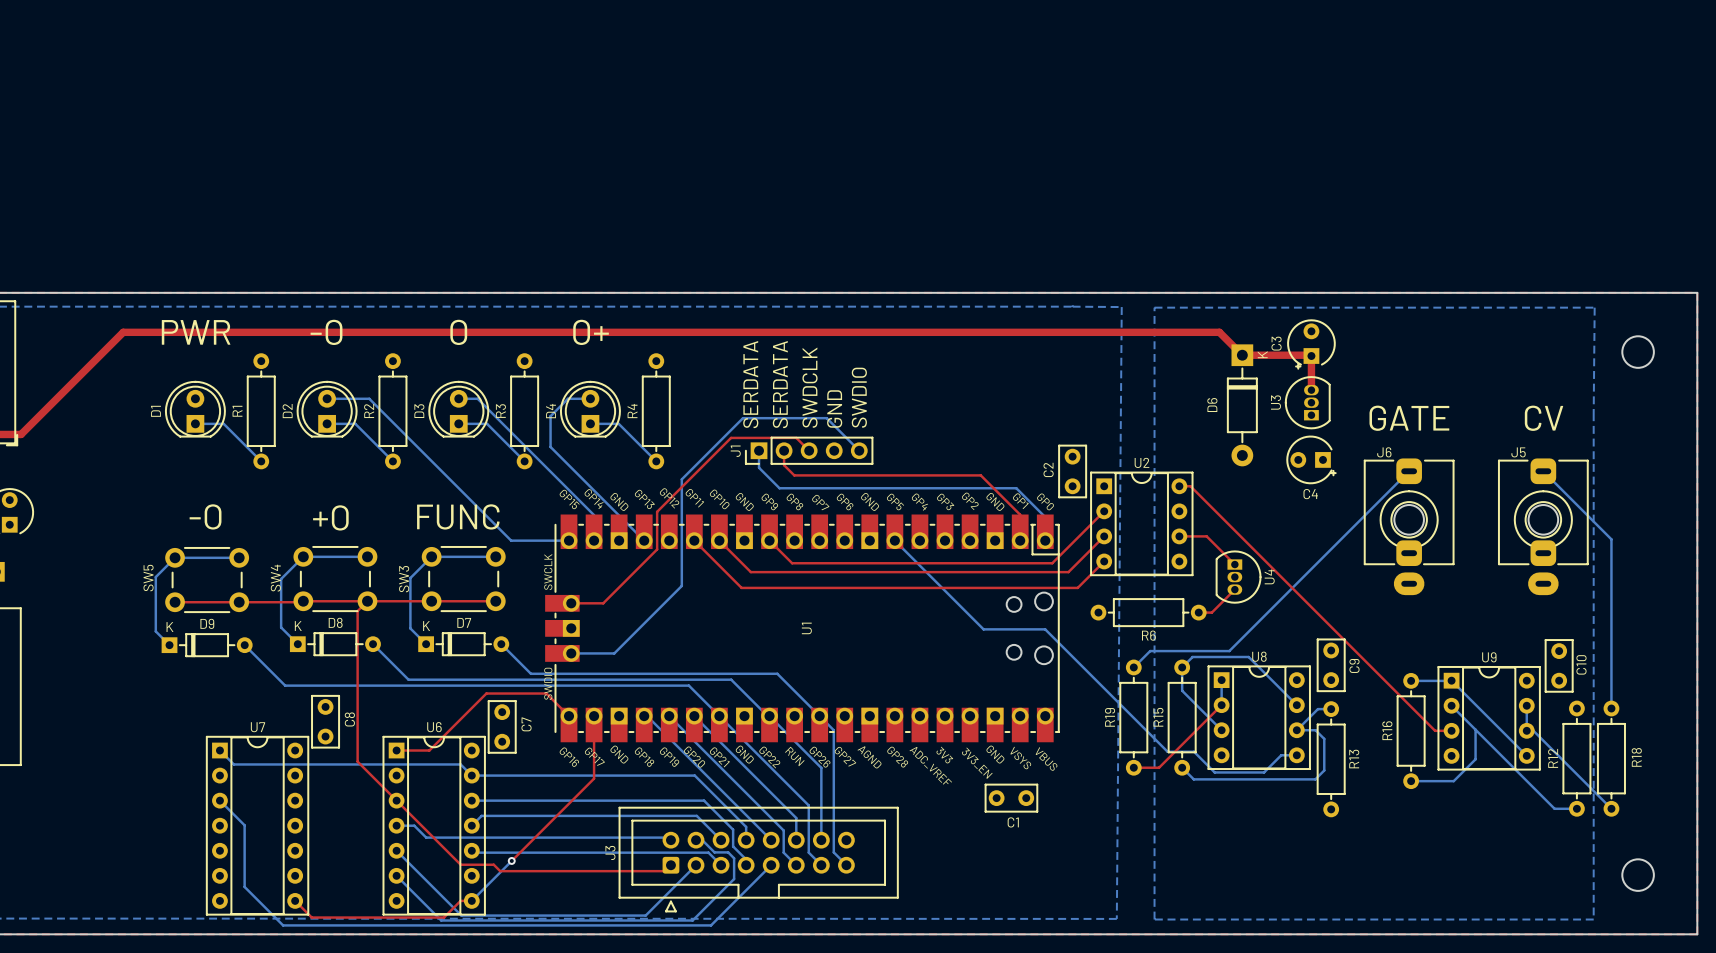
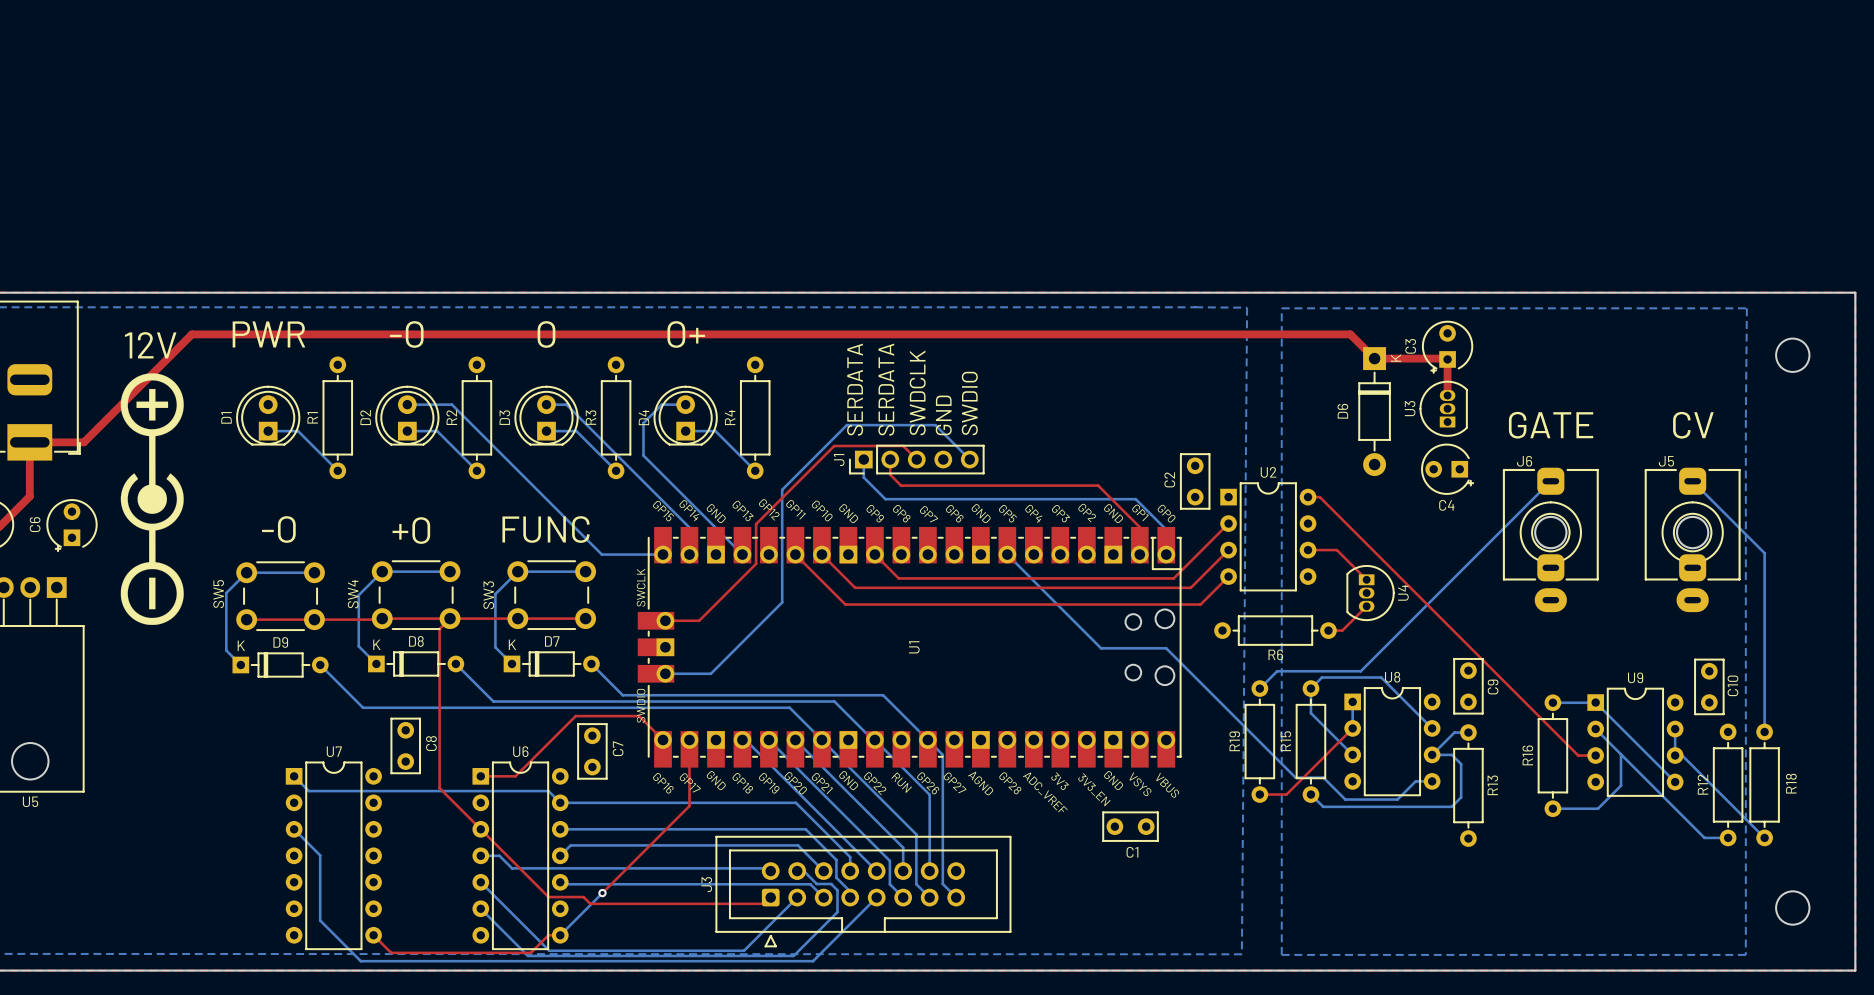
text: none -> 12V (150, 345)
drawing: none -> [120, 373, 184, 625]
U2 footprint: [1090, 471, 1194, 576] -> [1220, 482, 1317, 592]
U8 footprint: [1207, 665, 1311, 770] -> [1344, 687, 1441, 796]
U9 footprint: [1437, 666, 1541, 771] -> [1587, 688, 1684, 797]
U7 footprint: [206, 736, 309, 916] -> [285, 761, 382, 950]
U6 footprint: [382, 736, 486, 916] -> [472, 761, 569, 950]

